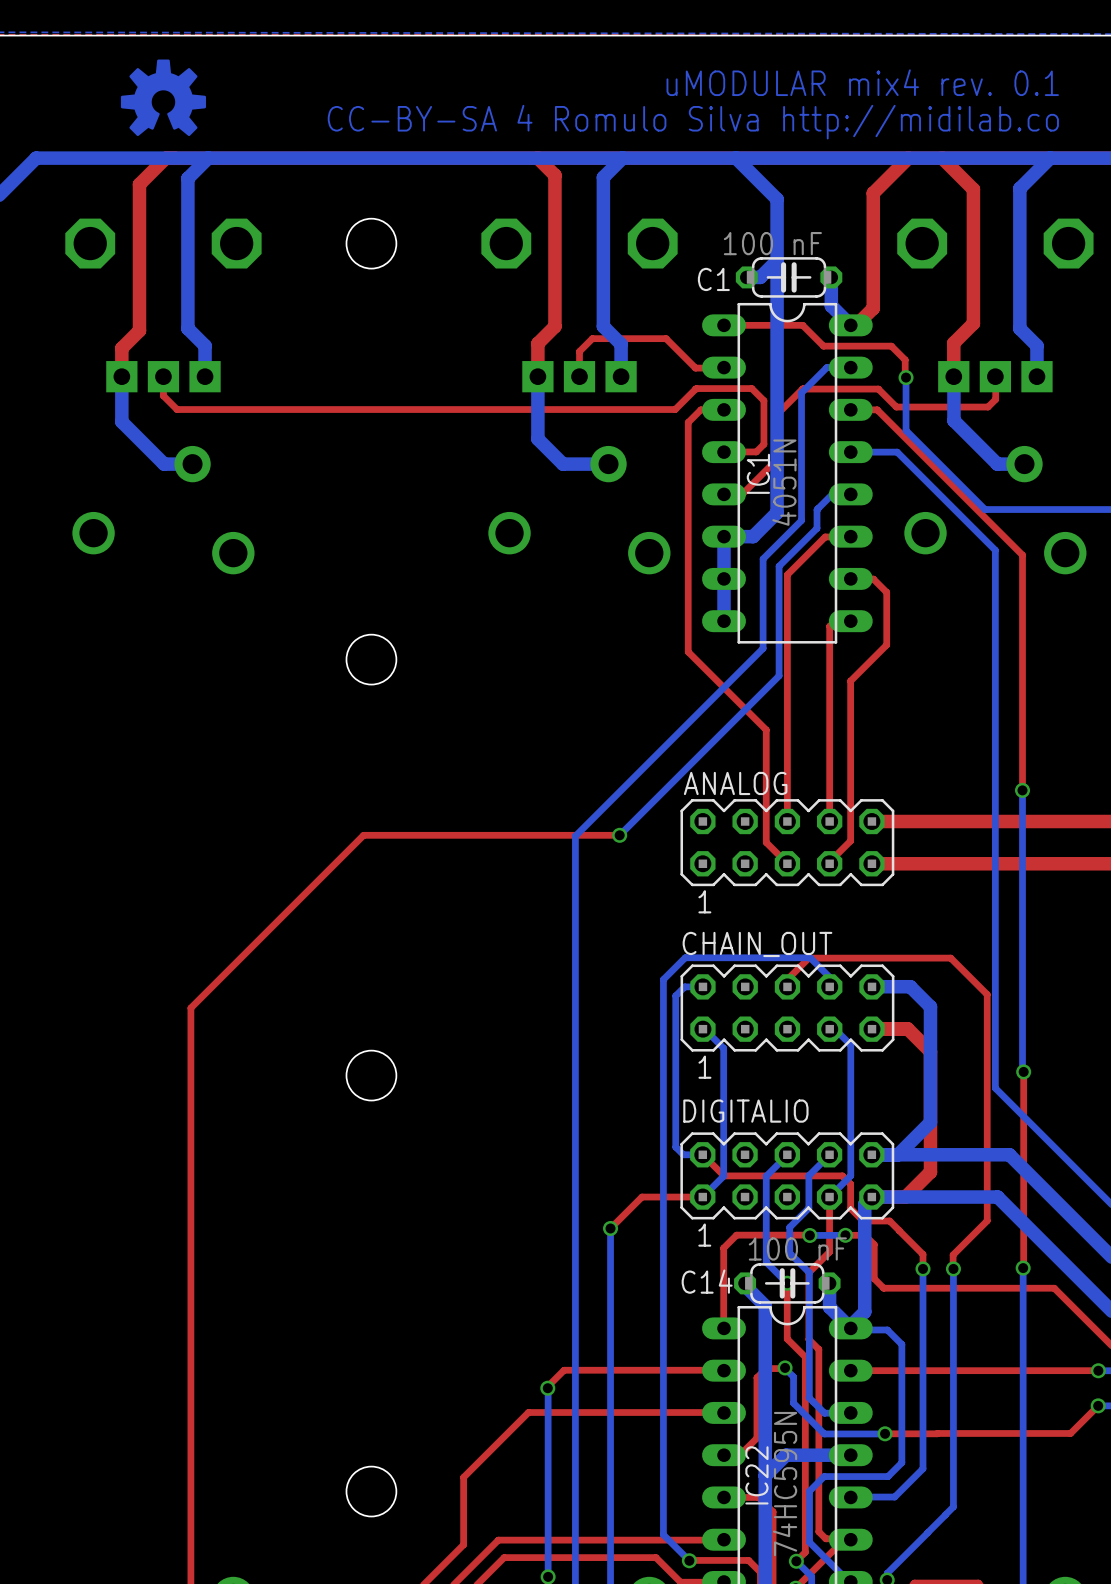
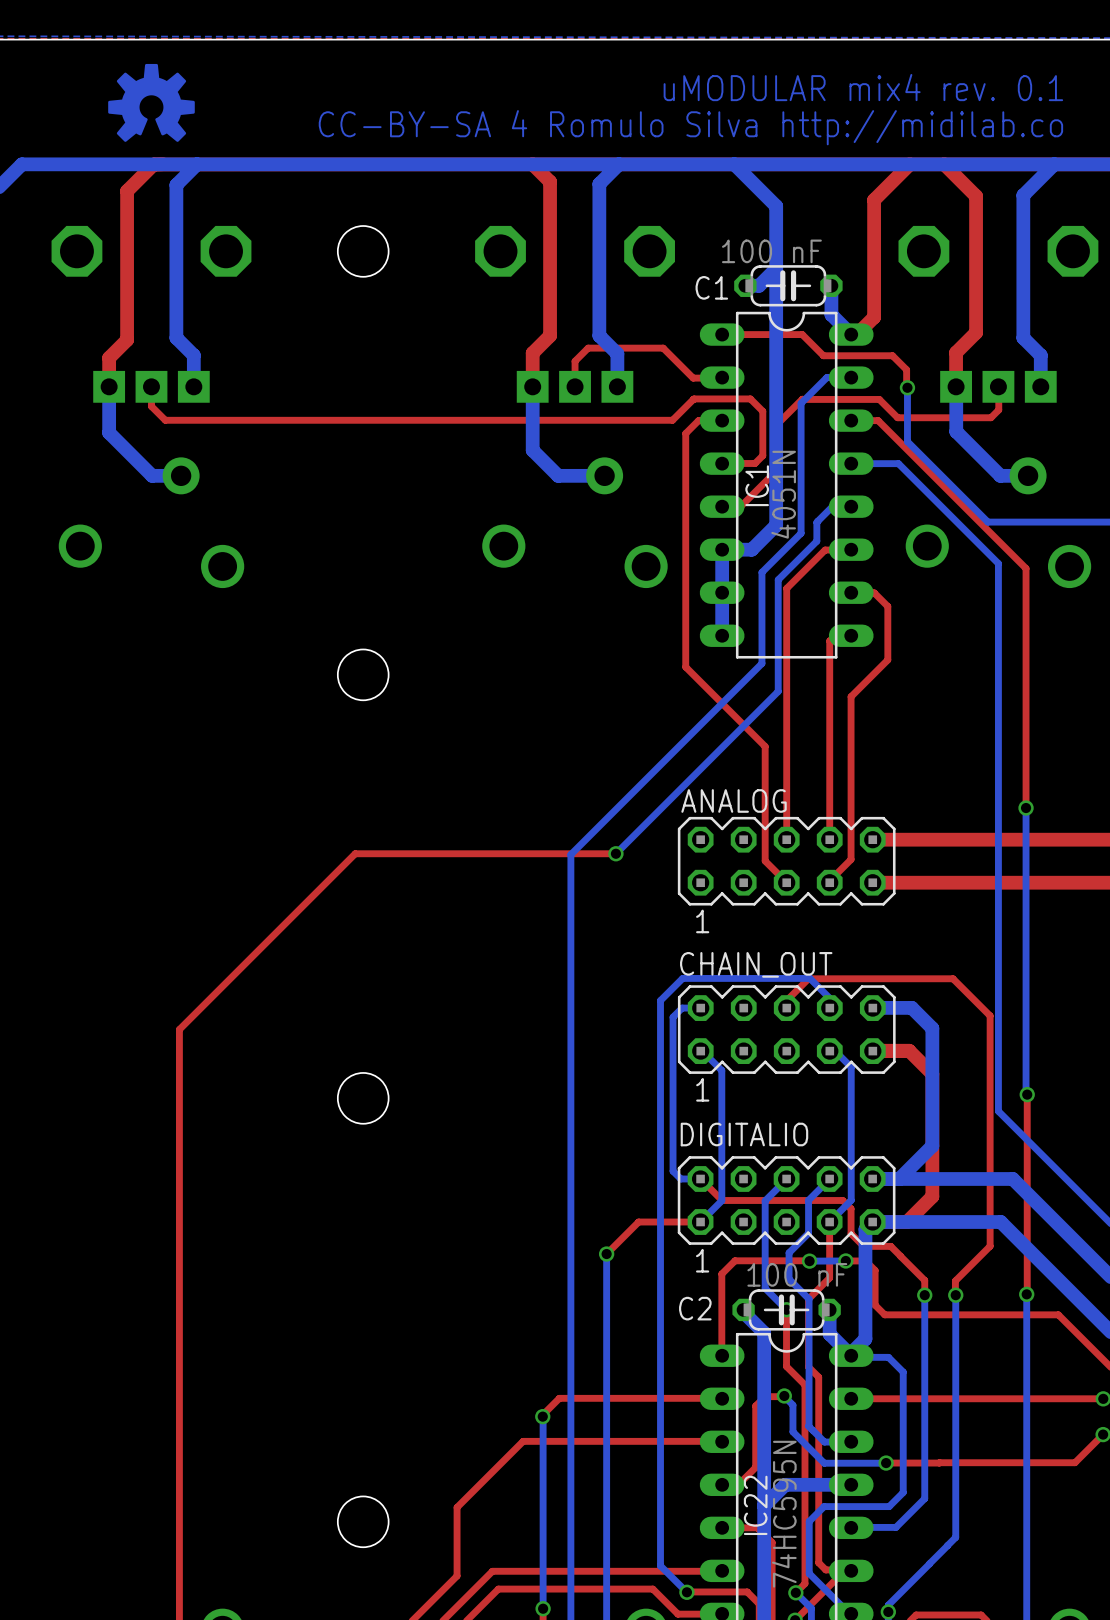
C14 name: C14 (707, 1281) -> C2 (695, 1308)

